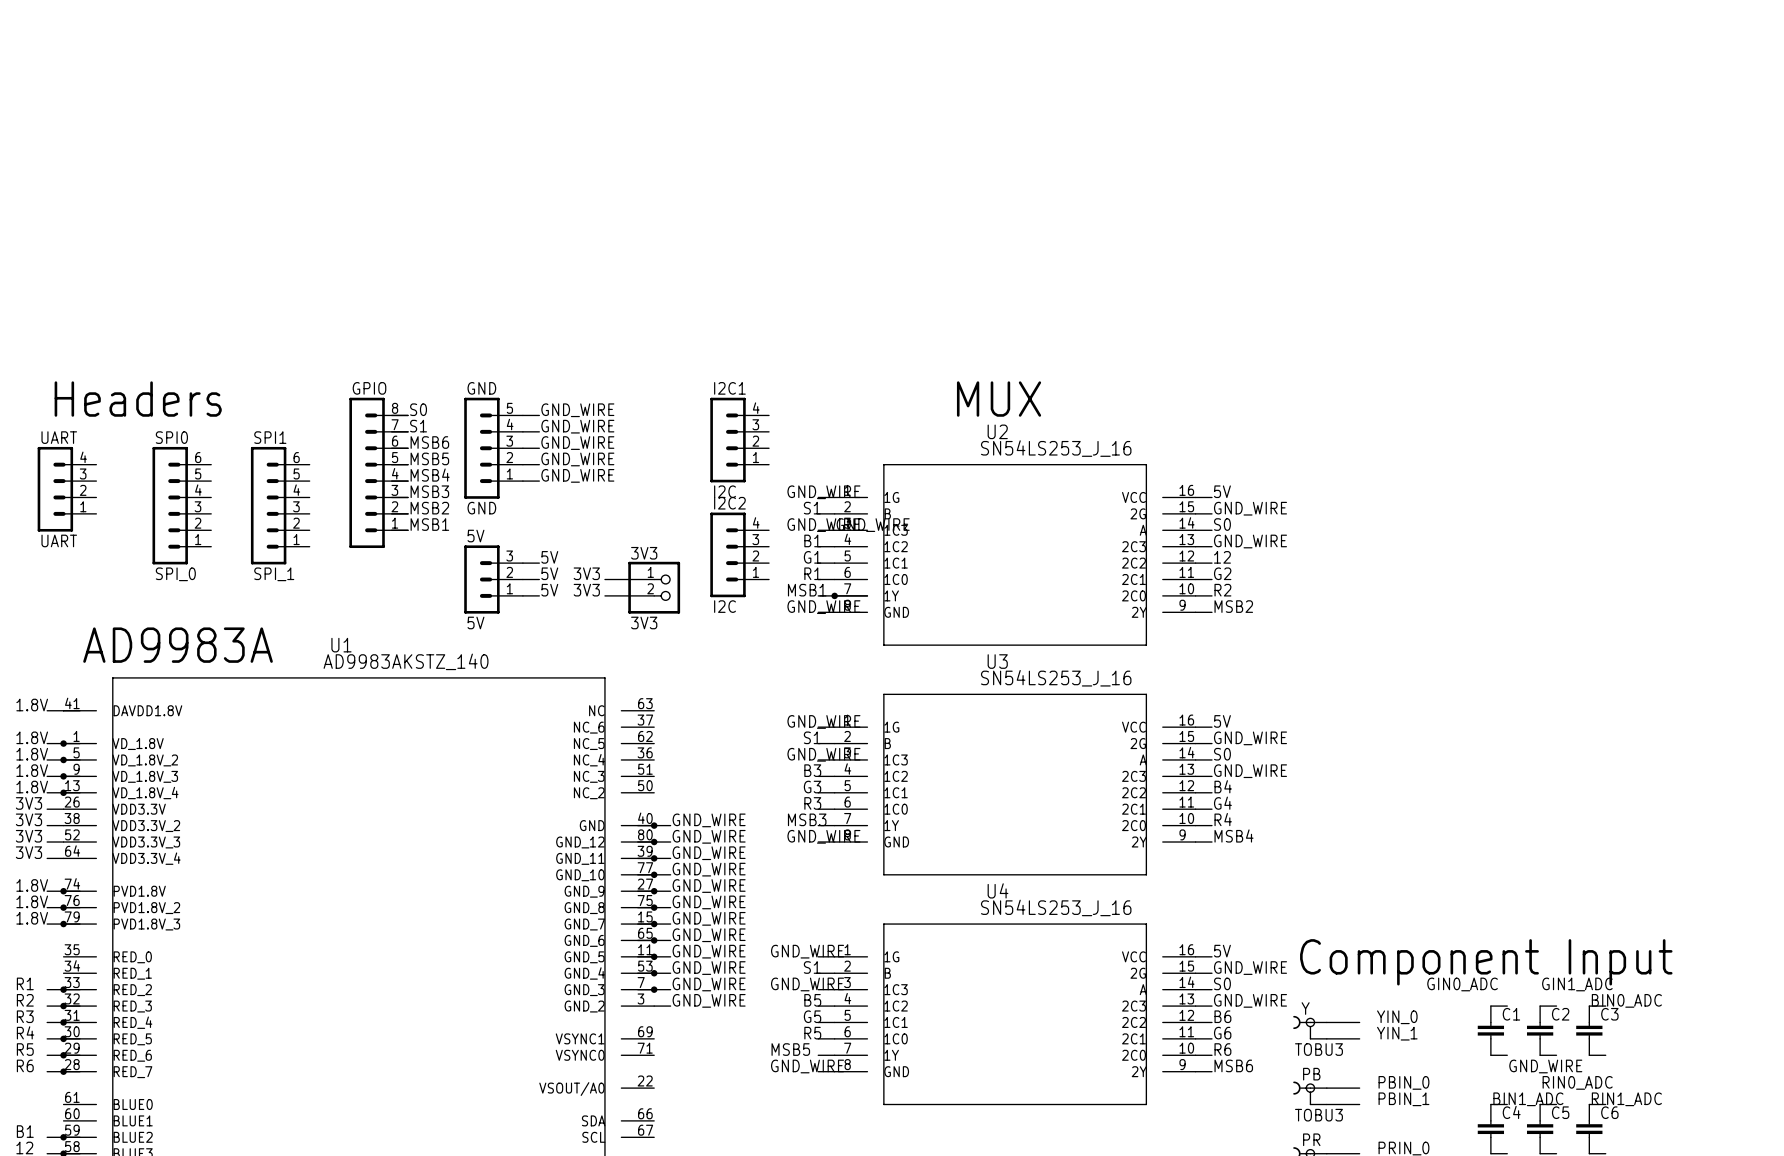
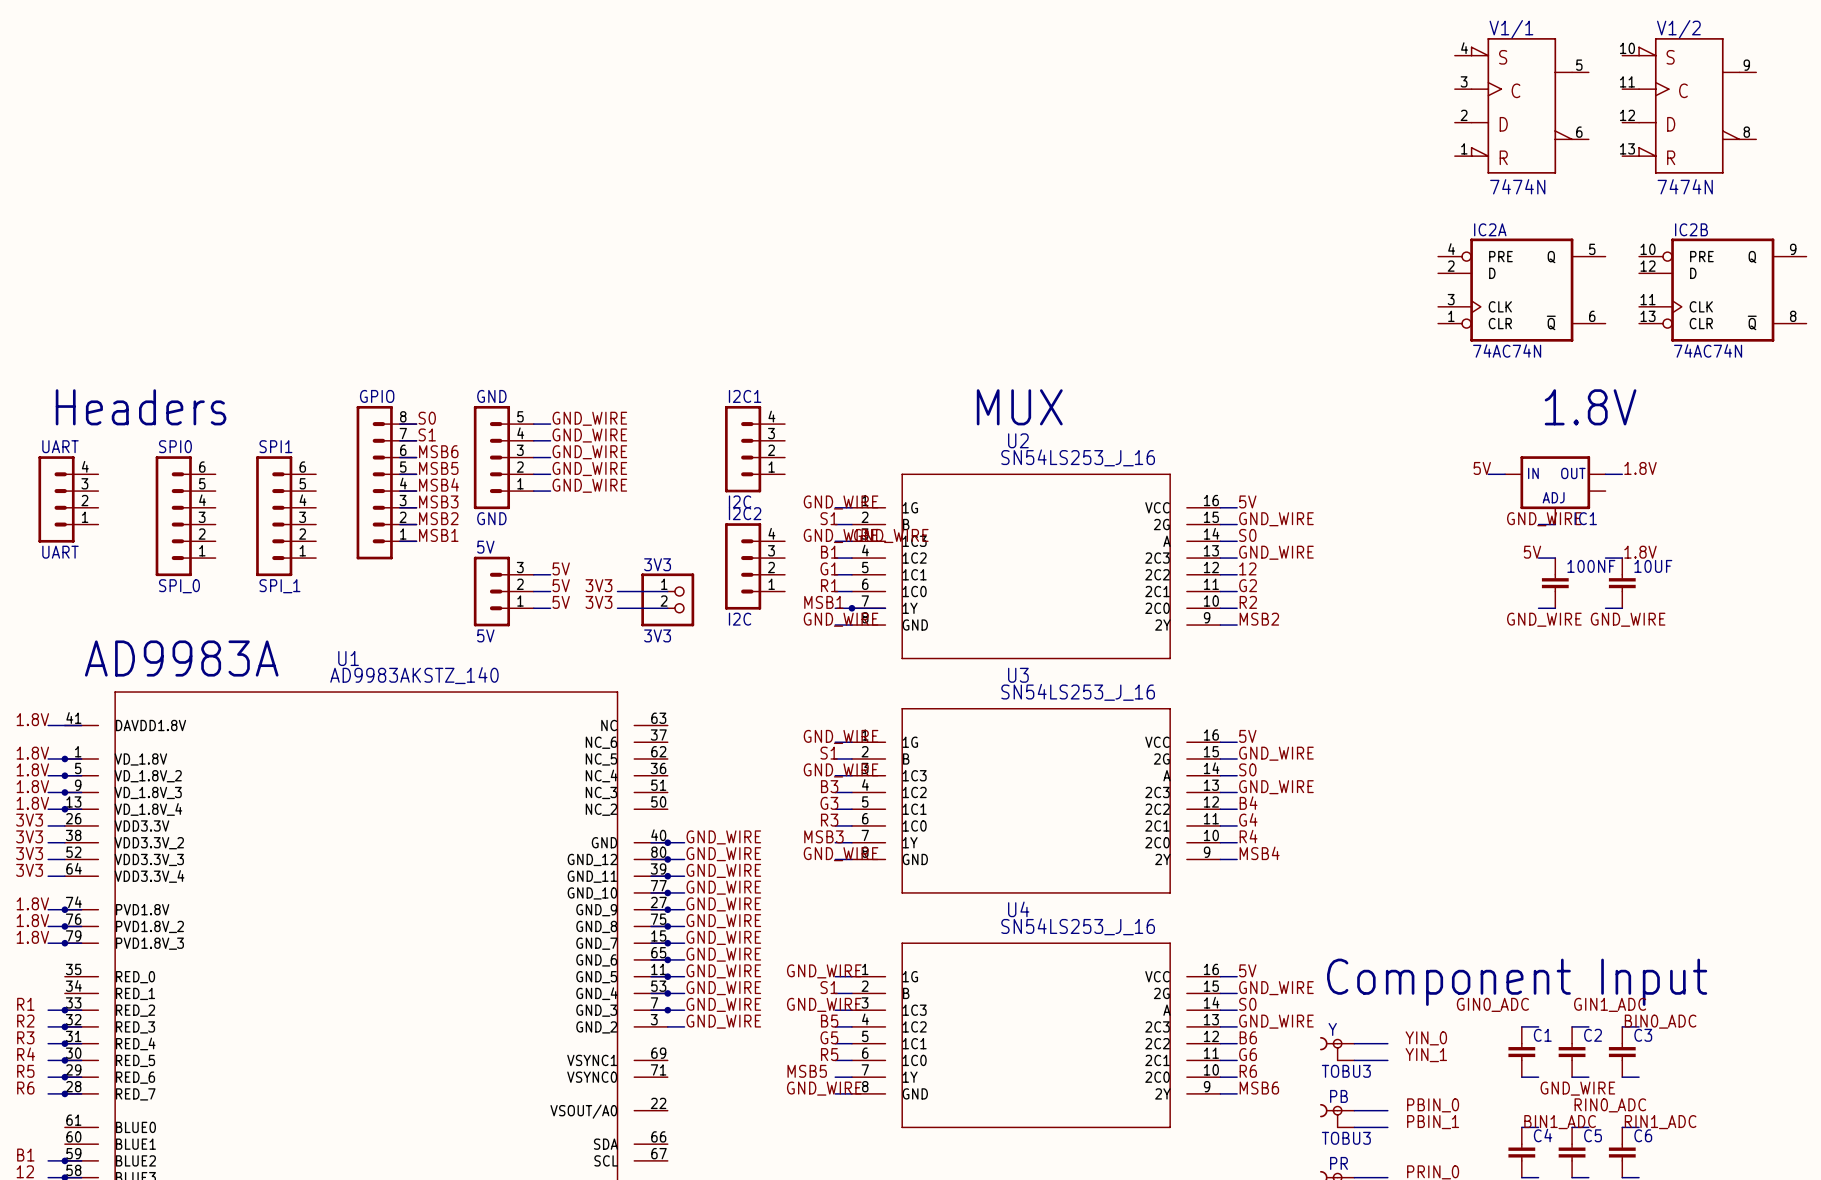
V1/1: none -> 7474N (1521, 105)
V1/2: none -> 7474N (1689, 105)
IC2A: none -> 74AC74N (1521, 290)
IC2B: none -> 74AC74N (1722, 290)
text: none -> 1.8V (1590, 407)
label: none -> 5V (1482, 468)
label: none -> 1.8V (1640, 468)
wire: none -> (1488, 474) (1505, 474)
wire: none -> (1605, 474) (1622, 474)
IC1: none -> (1555, 490)
label: none -> GND_WIRE (1544, 519)
wire: none -> (1538, 524) (1555, 524)
label: none -> 5V (1532, 552)
label: none -> 1.8V (1640, 552)
wire: none -> (1538, 558) (1555, 558)
wire: none -> (1605, 558) (1622, 558)
100NF: none -> (1555, 583)
10UF: none -> (1622, 583)
wire: none -> (1538, 608) (1555, 608)
wire: none -> (1605, 608) (1622, 608)
label: none -> GND_WIRE (1544, 619)
label: none -> GND_WIRE (1628, 619)

